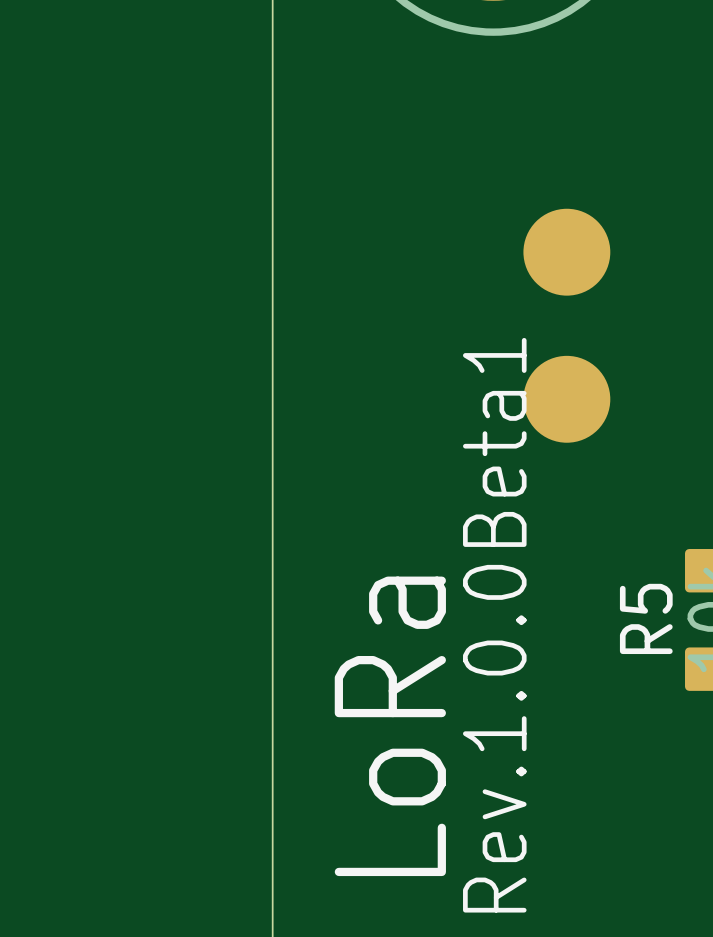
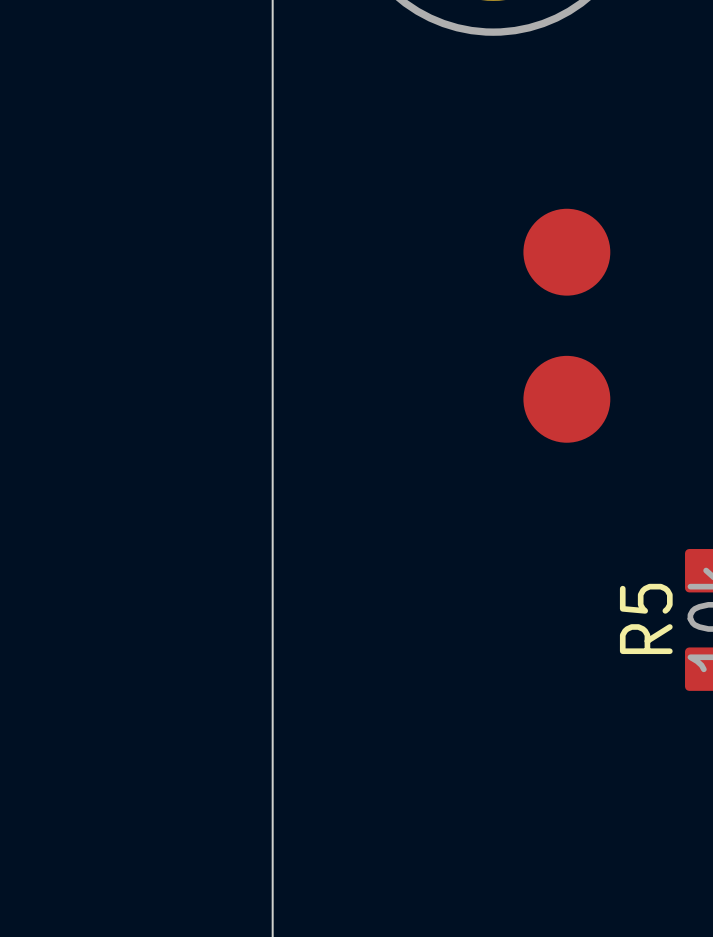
text: Rev.1.0.0Beta1 (494, 625) -> none
text: LoRa (390, 726) -> none

